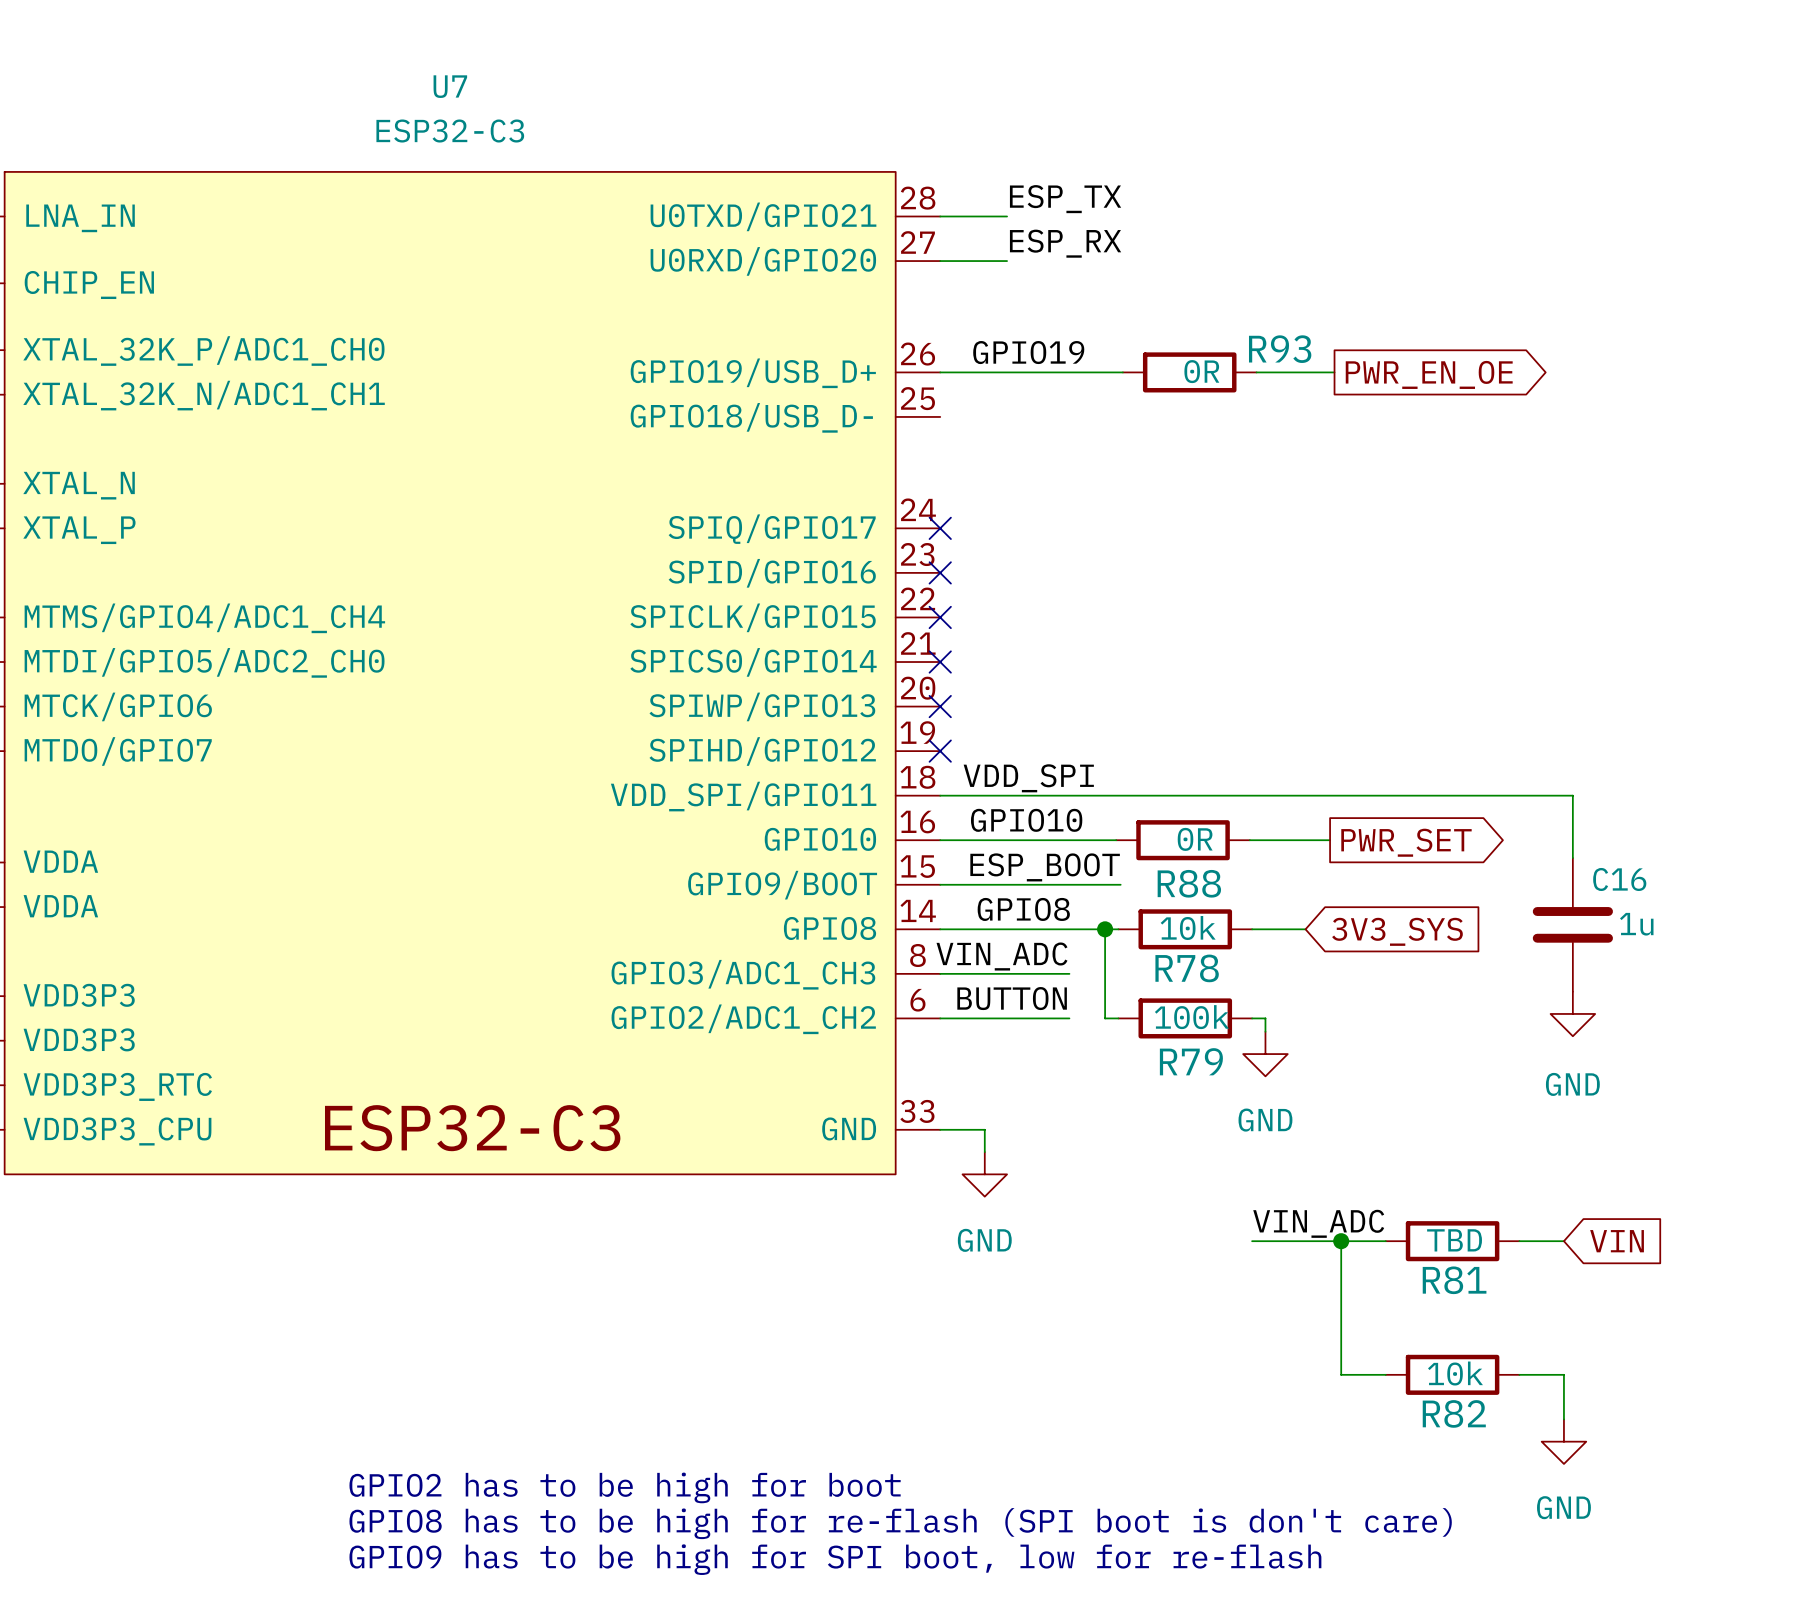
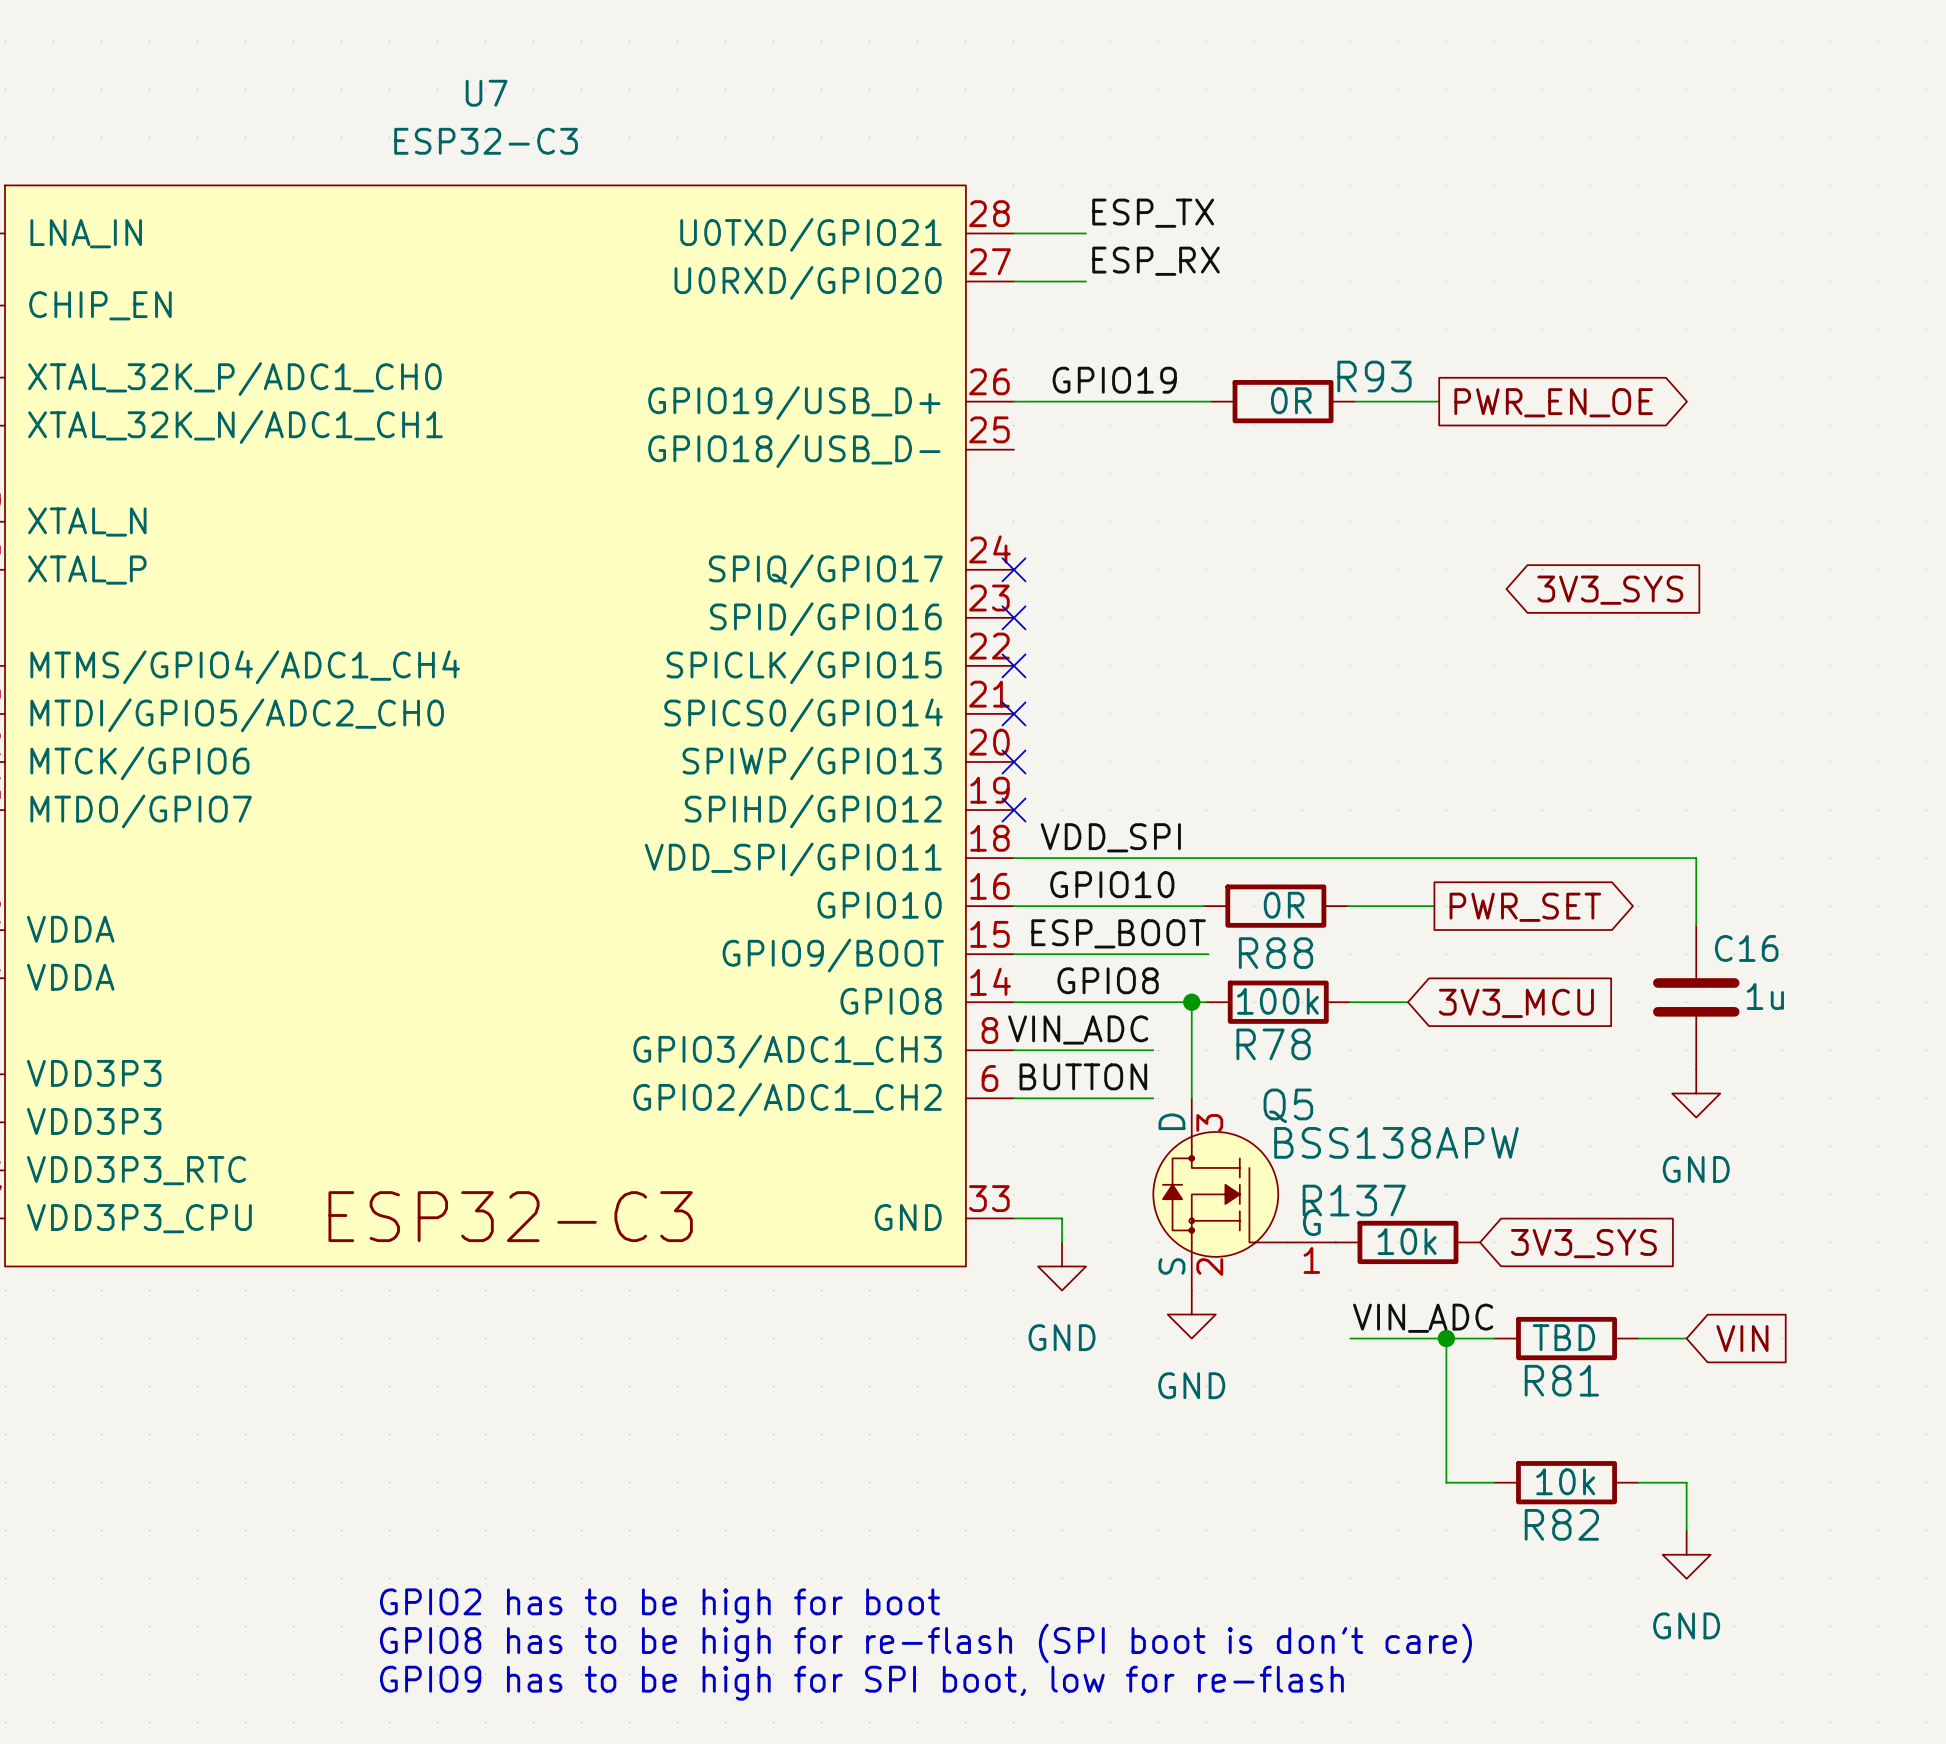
global label: none -> 3V3_SYS (1610, 590)
R78 text: 10k (1188, 928) -> 100k (1277, 1001)
global label: 3V3_SYS (1397, 931) -> 3V3_MCU (1516, 1003)
wire: (1105, 1018) (1118, 1018) -> none
R79: (1185, 1018) -> none
wire: (1252, 1018) (1265, 1018) (1265, 1031) -> none
power symbol position: GND (1265, 1054) -> GND (1191, 1314)
Q5: none -> BSS138APW (1244, 1194)
R137: none -> (1407, 1242)
global label: none -> 3V3_SYS (1583, 1243)

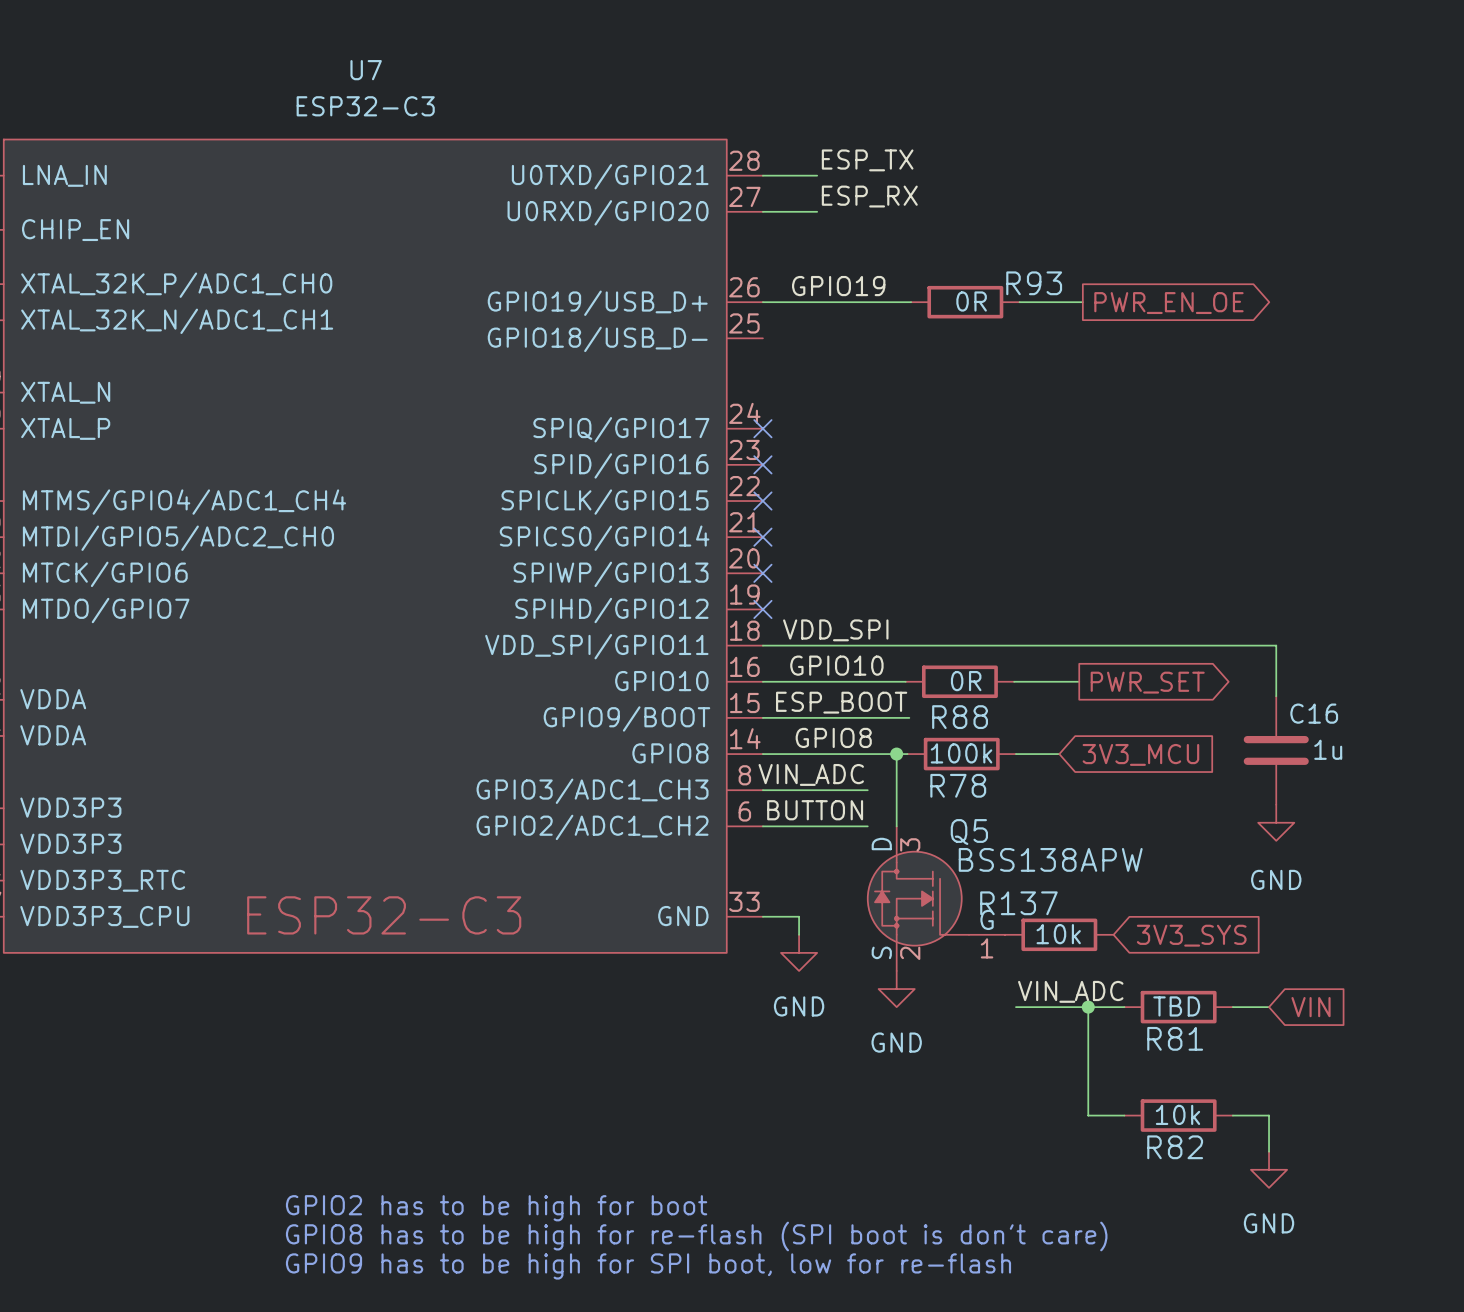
global label: 3V3_SYS (1610, 590) -> none

